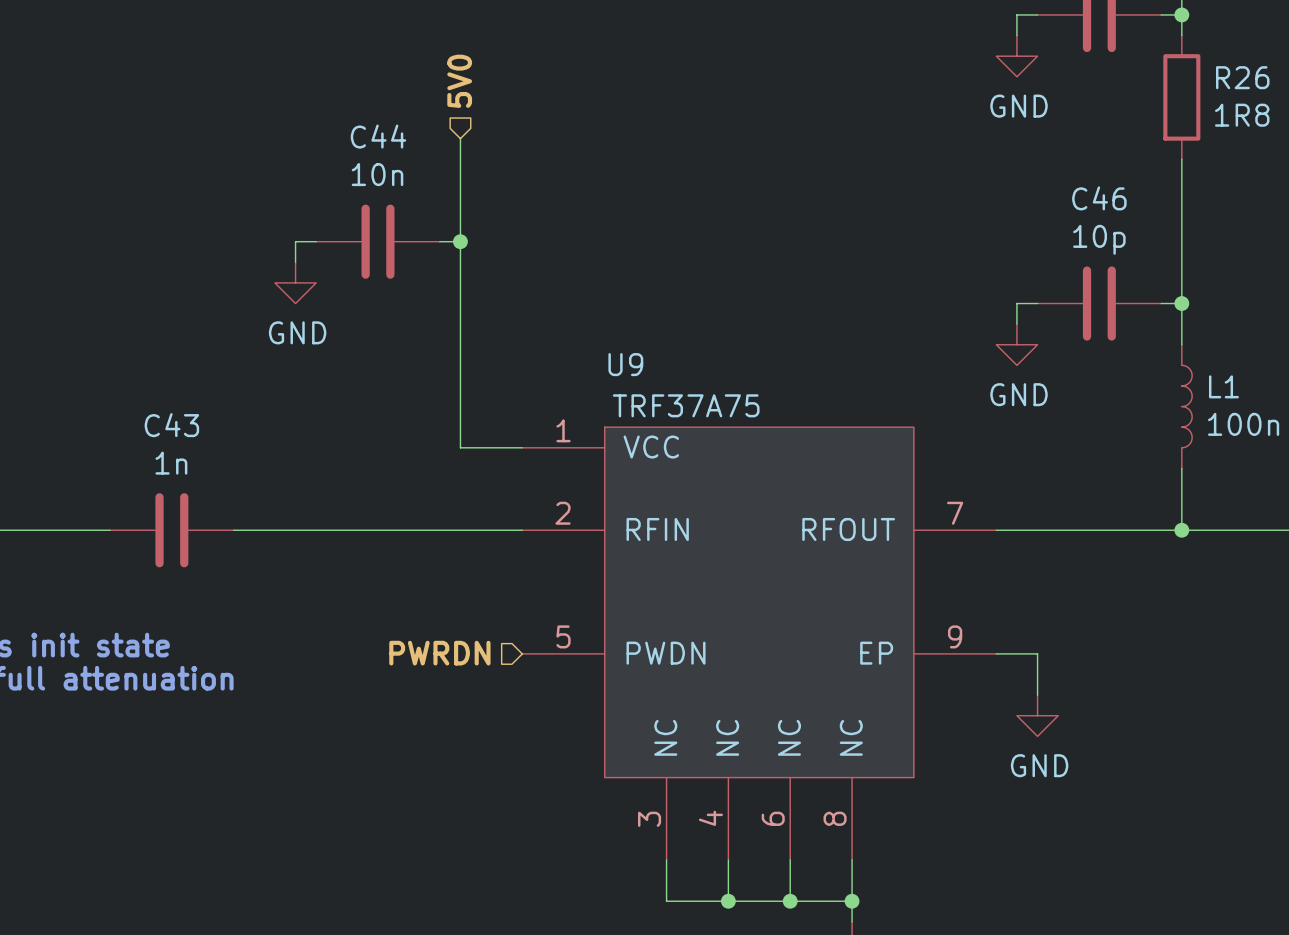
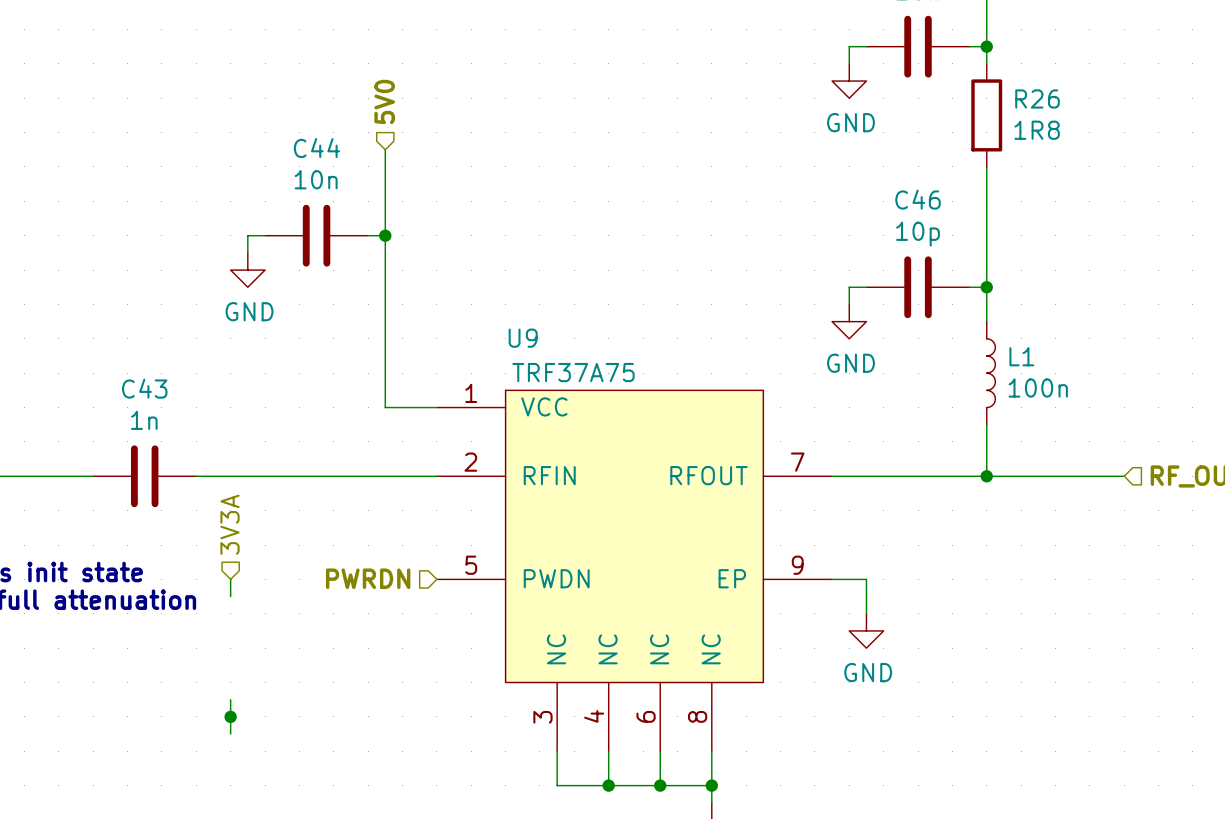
hierarchical label: none -> 3V3A (229, 524)
wire: none -> (230, 579) (230, 596)
wire: none -> (230, 699) (230, 734)
junction: none -> (230, 716)

